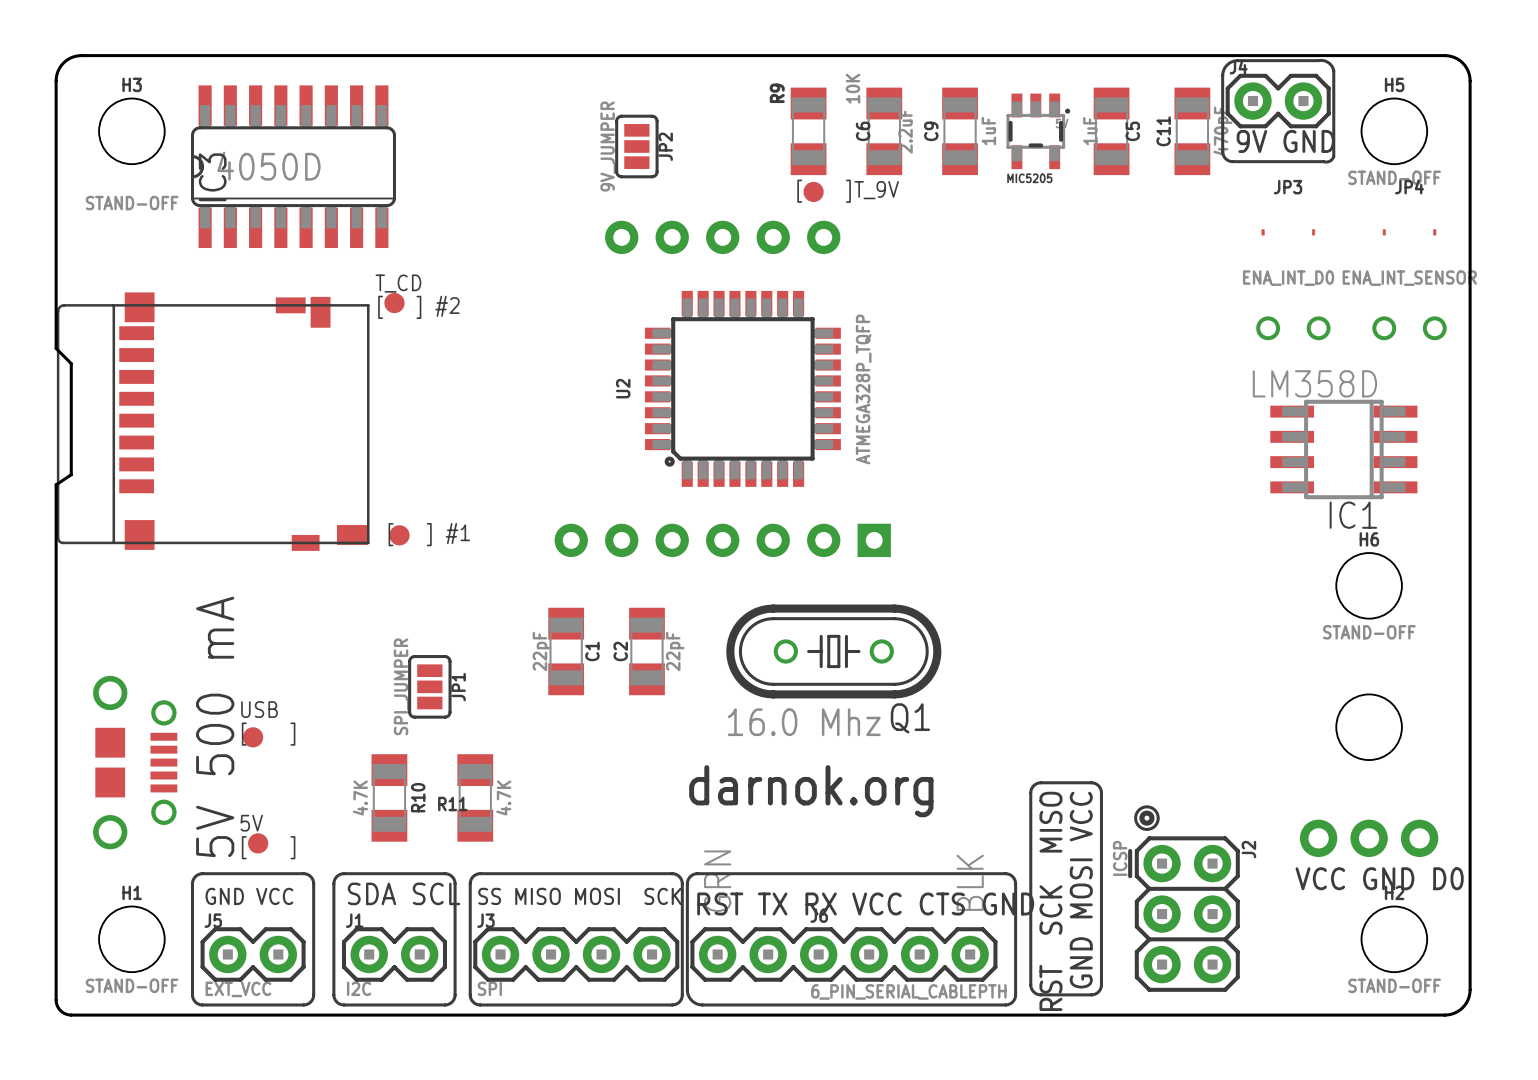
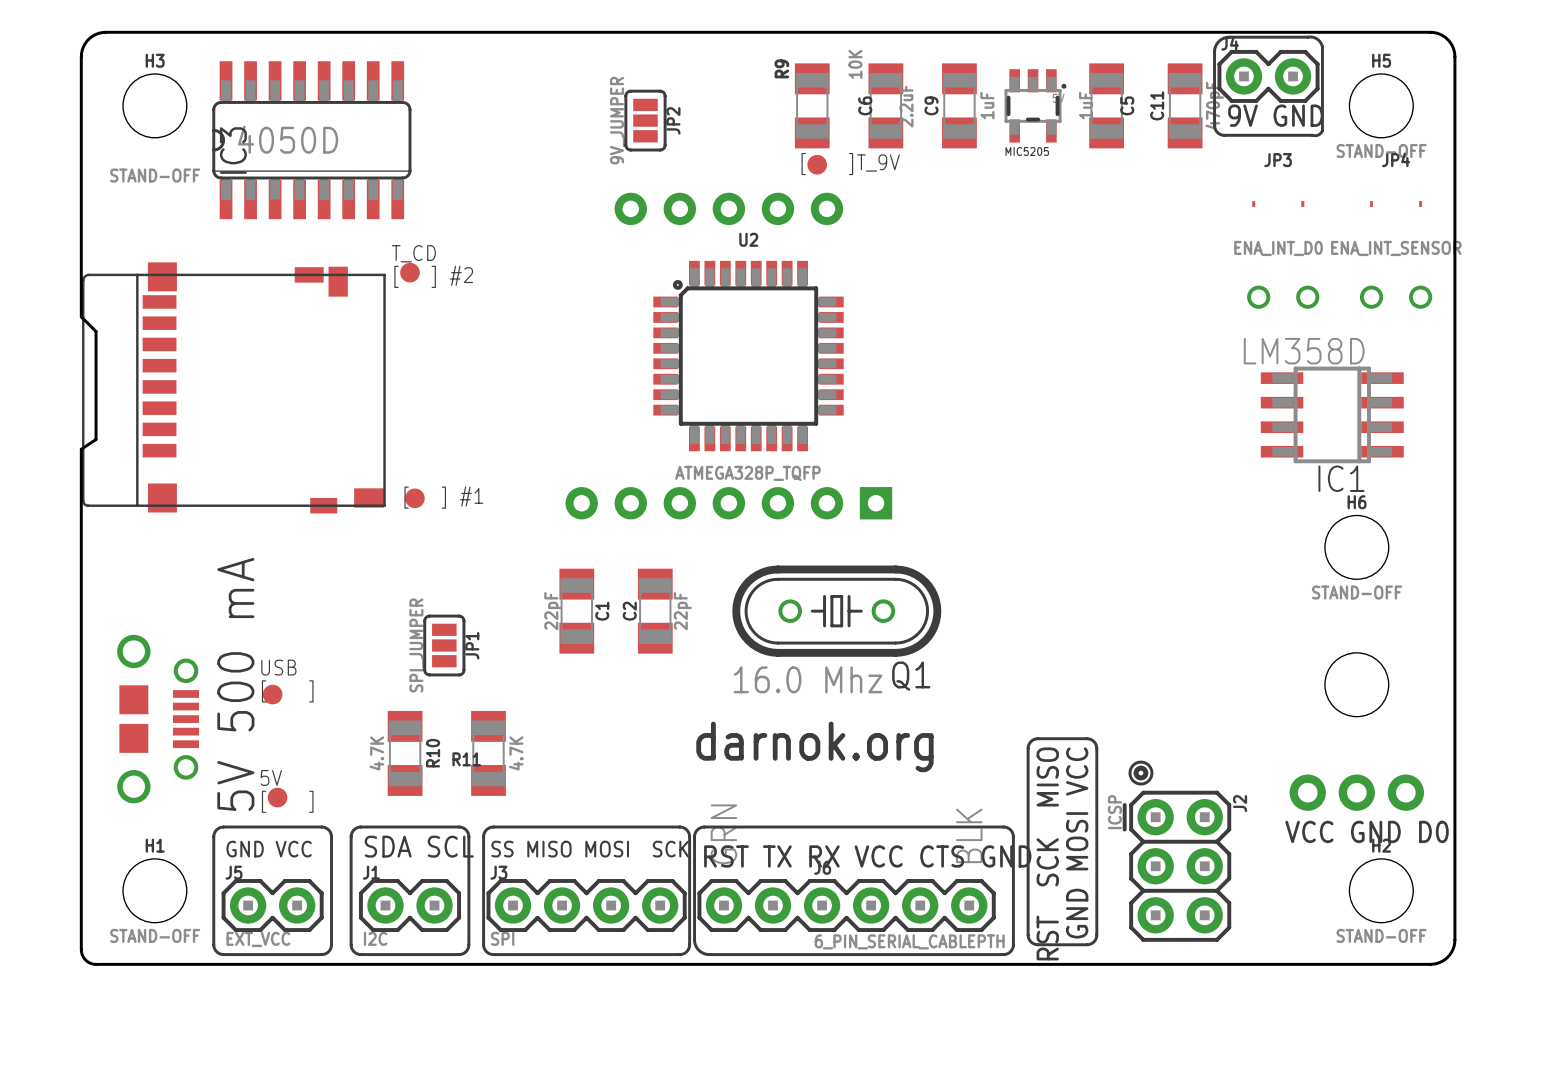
U2 rotation: 0° (742, 388) -> 90° clockwise (748, 356)

